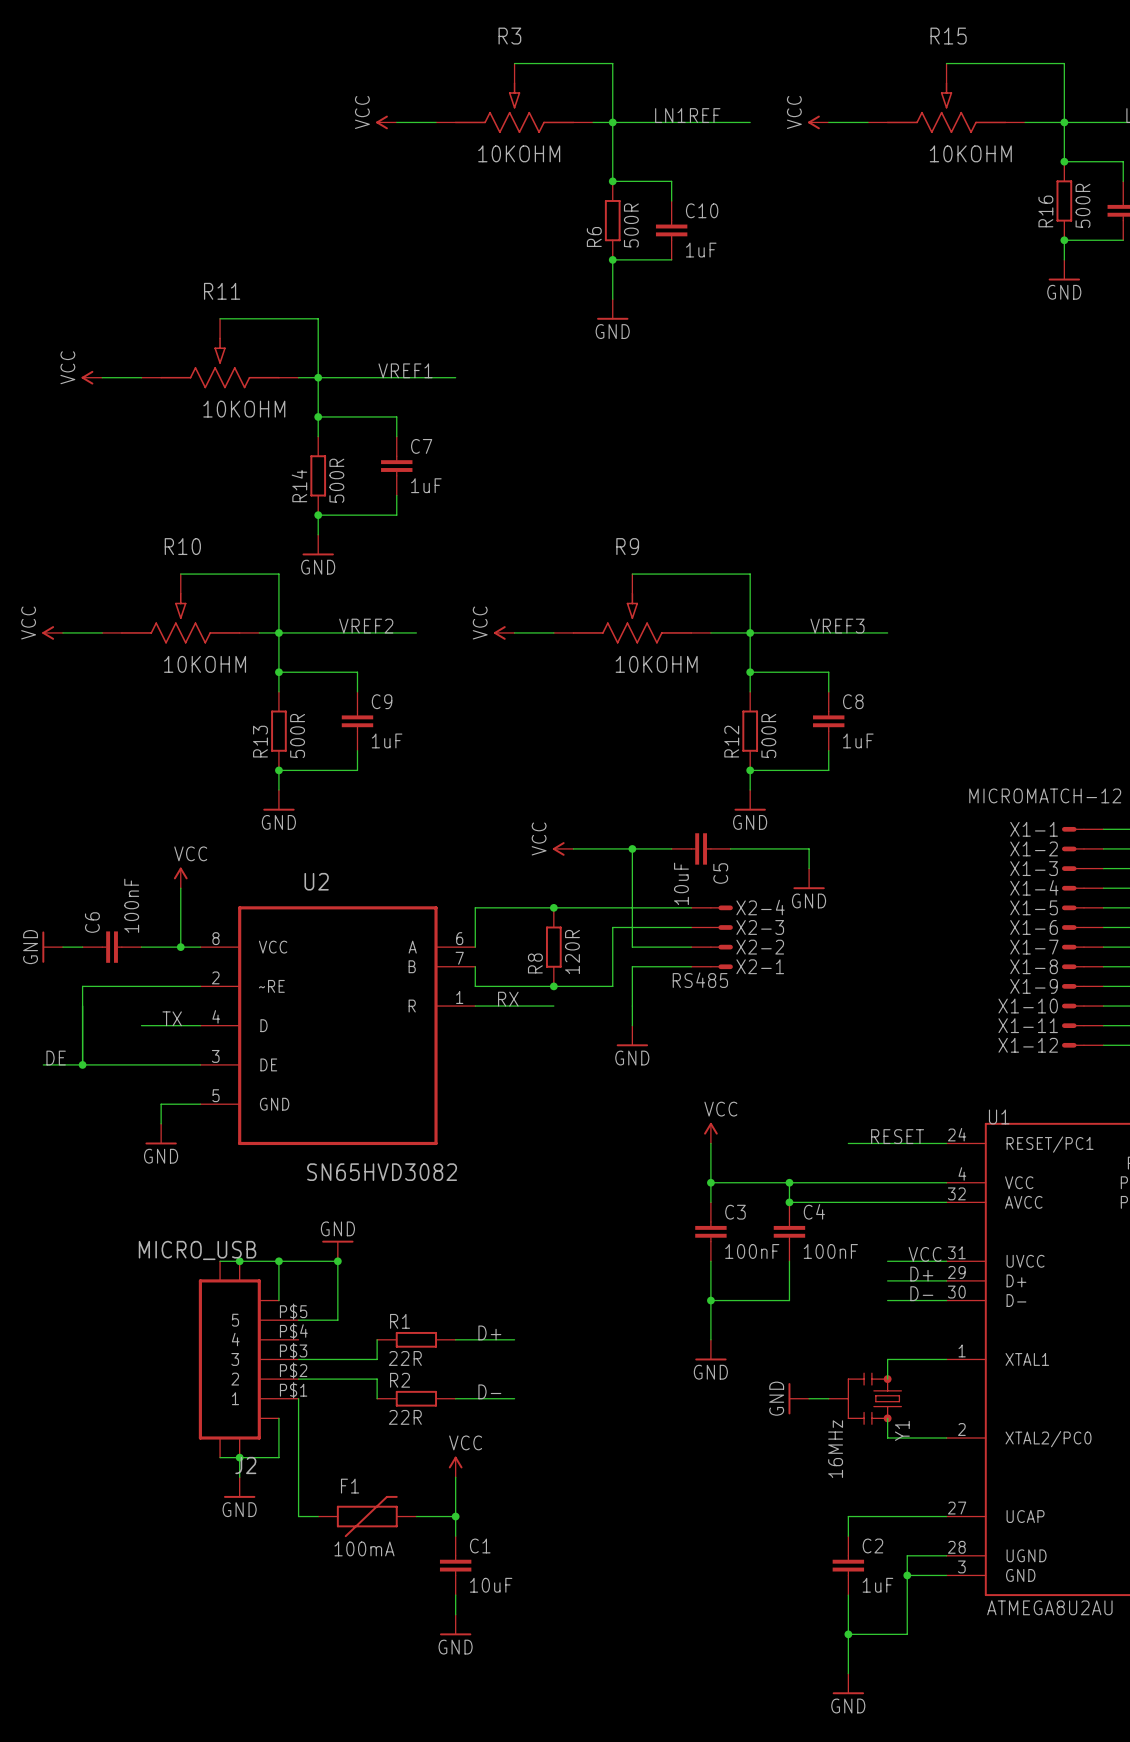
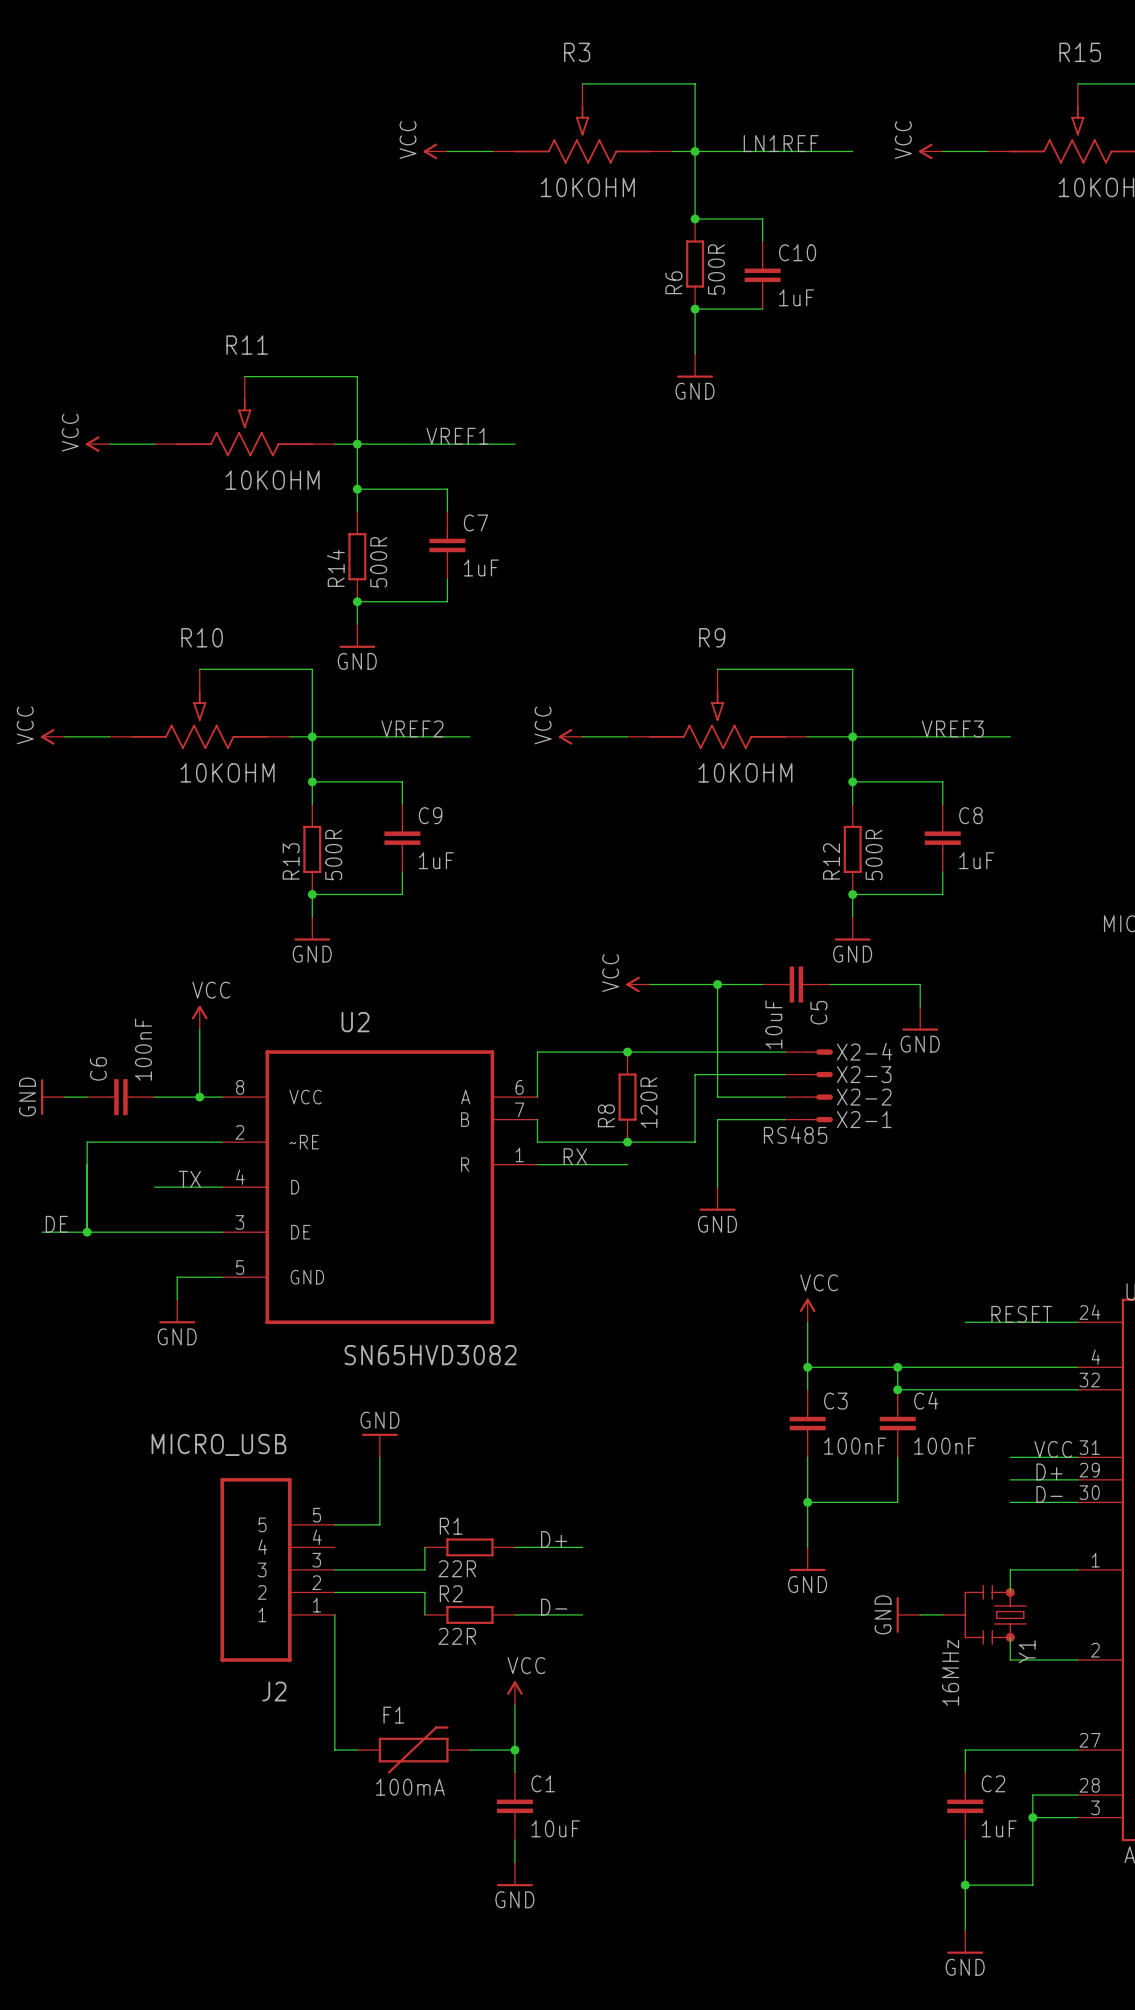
J2 symbol: [198, 1261, 299, 1458] -> [220, 1478, 335, 1662]
wire: (220, 1261) (337, 1261) -> none
junction: (239, 1261) -> none
wire: (278, 1261) (278, 1300) -> none
junction: (278, 1261) -> none
junction: (337, 1261) -> none
wire: (278, 1418) (278, 1457) (220, 1457) -> none
wire: (239, 1457) (239, 1477) -> none
junction: (239, 1457) -> none
power symbol: GND (239, 1487) -> none

